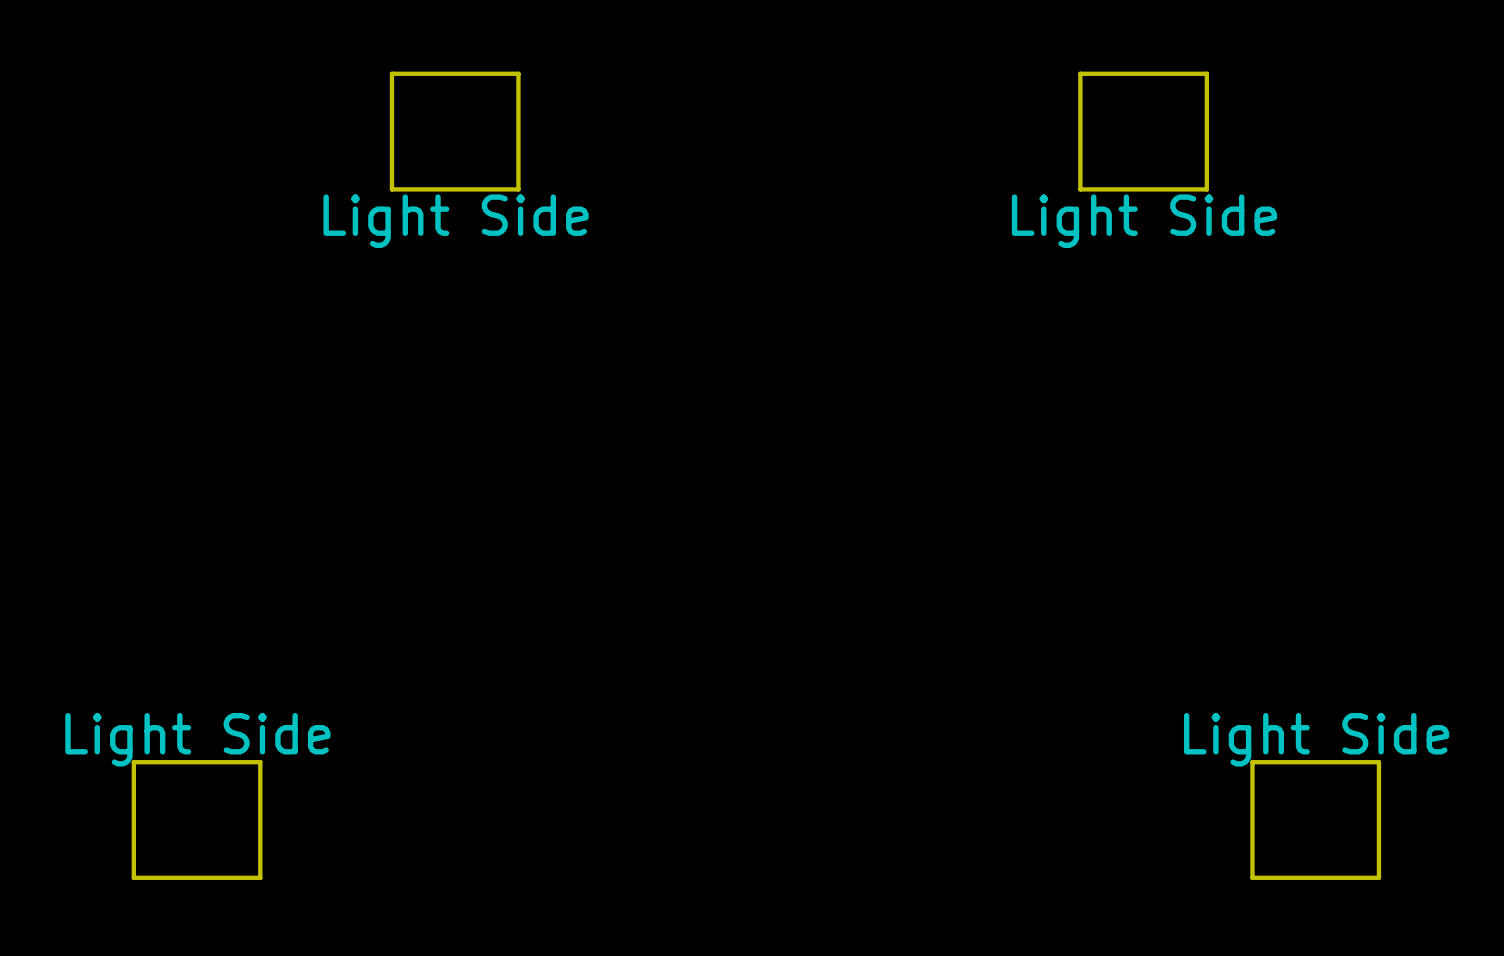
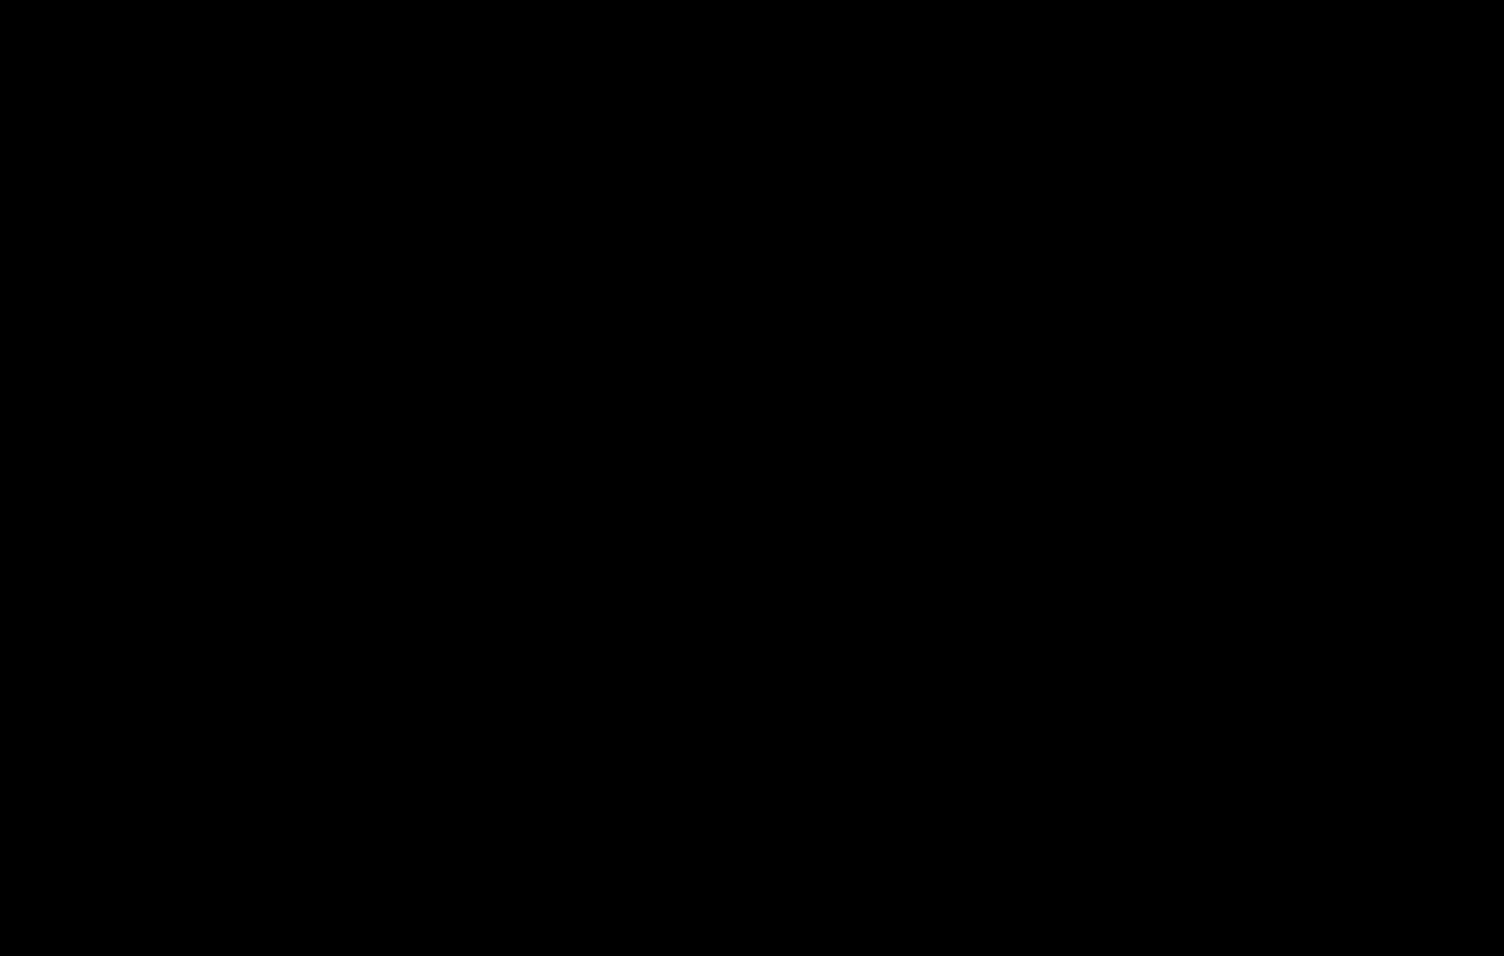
part: (455, 131) -> none
part: (1143, 131) -> none
part: (197, 820) -> none
part: (1315, 820) -> none

